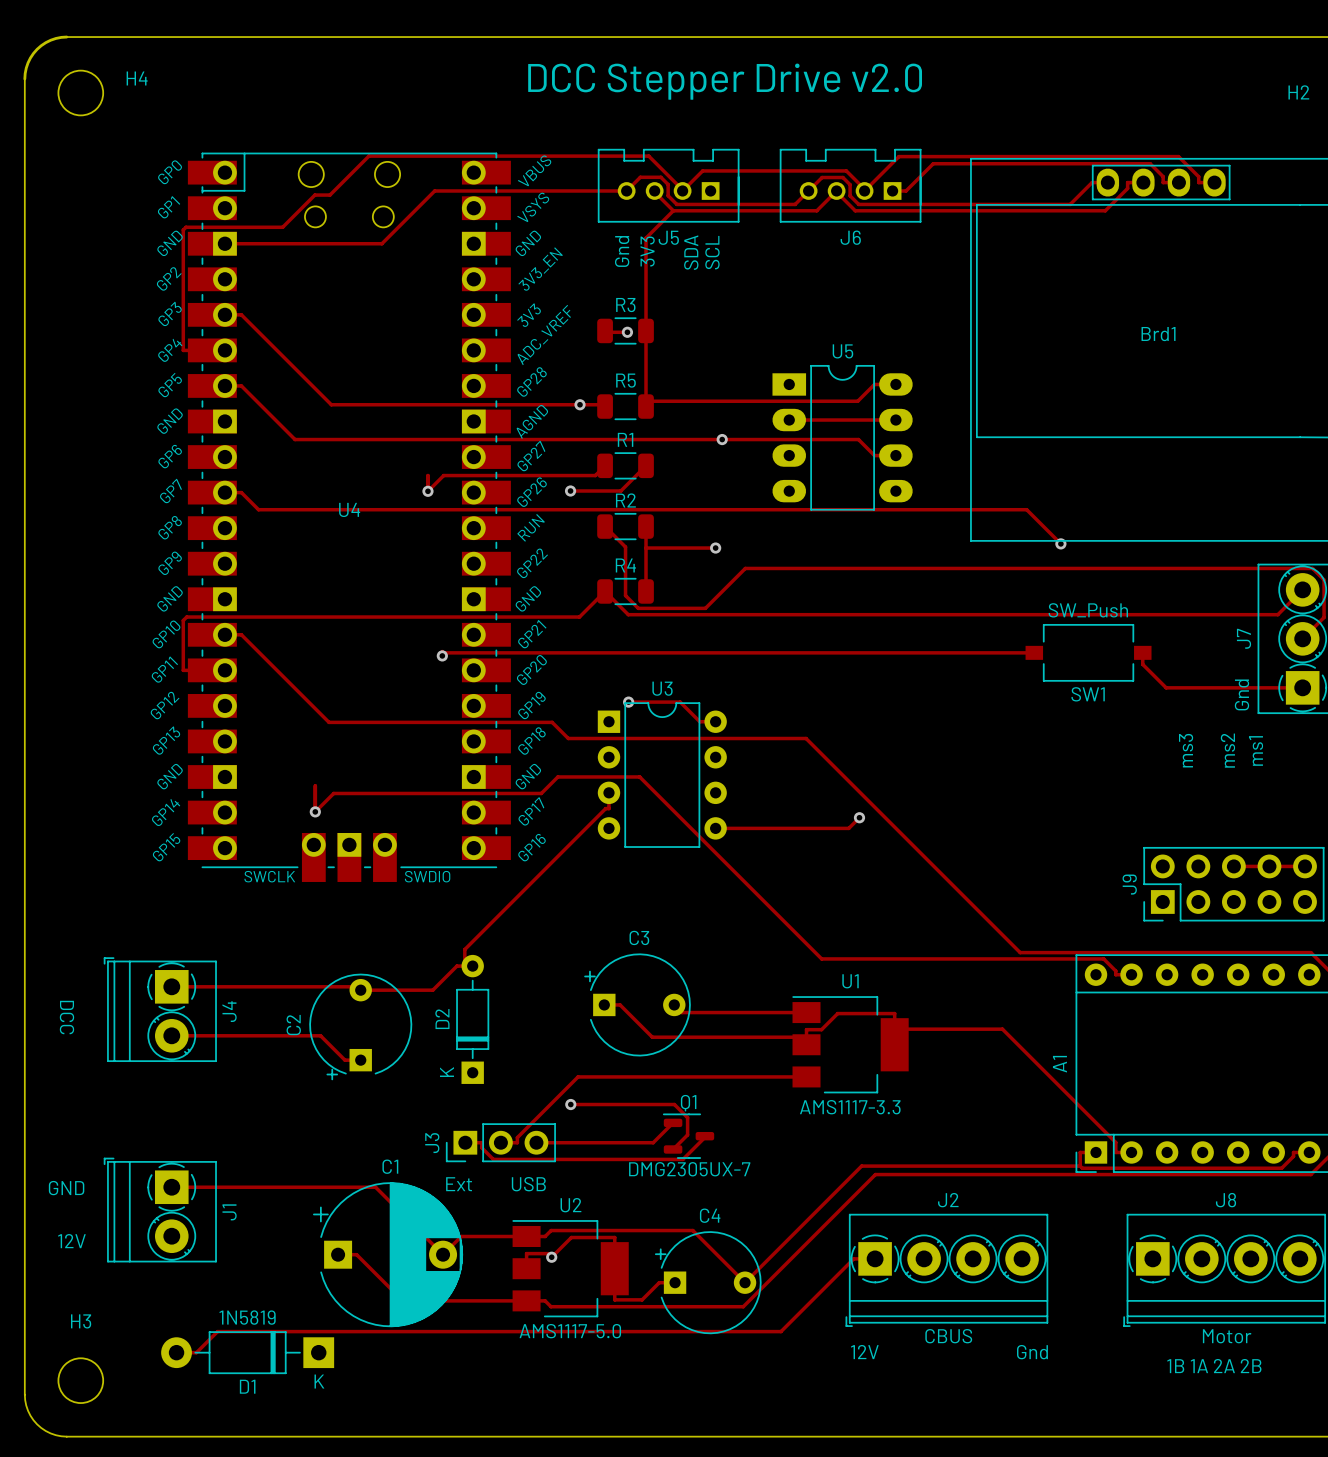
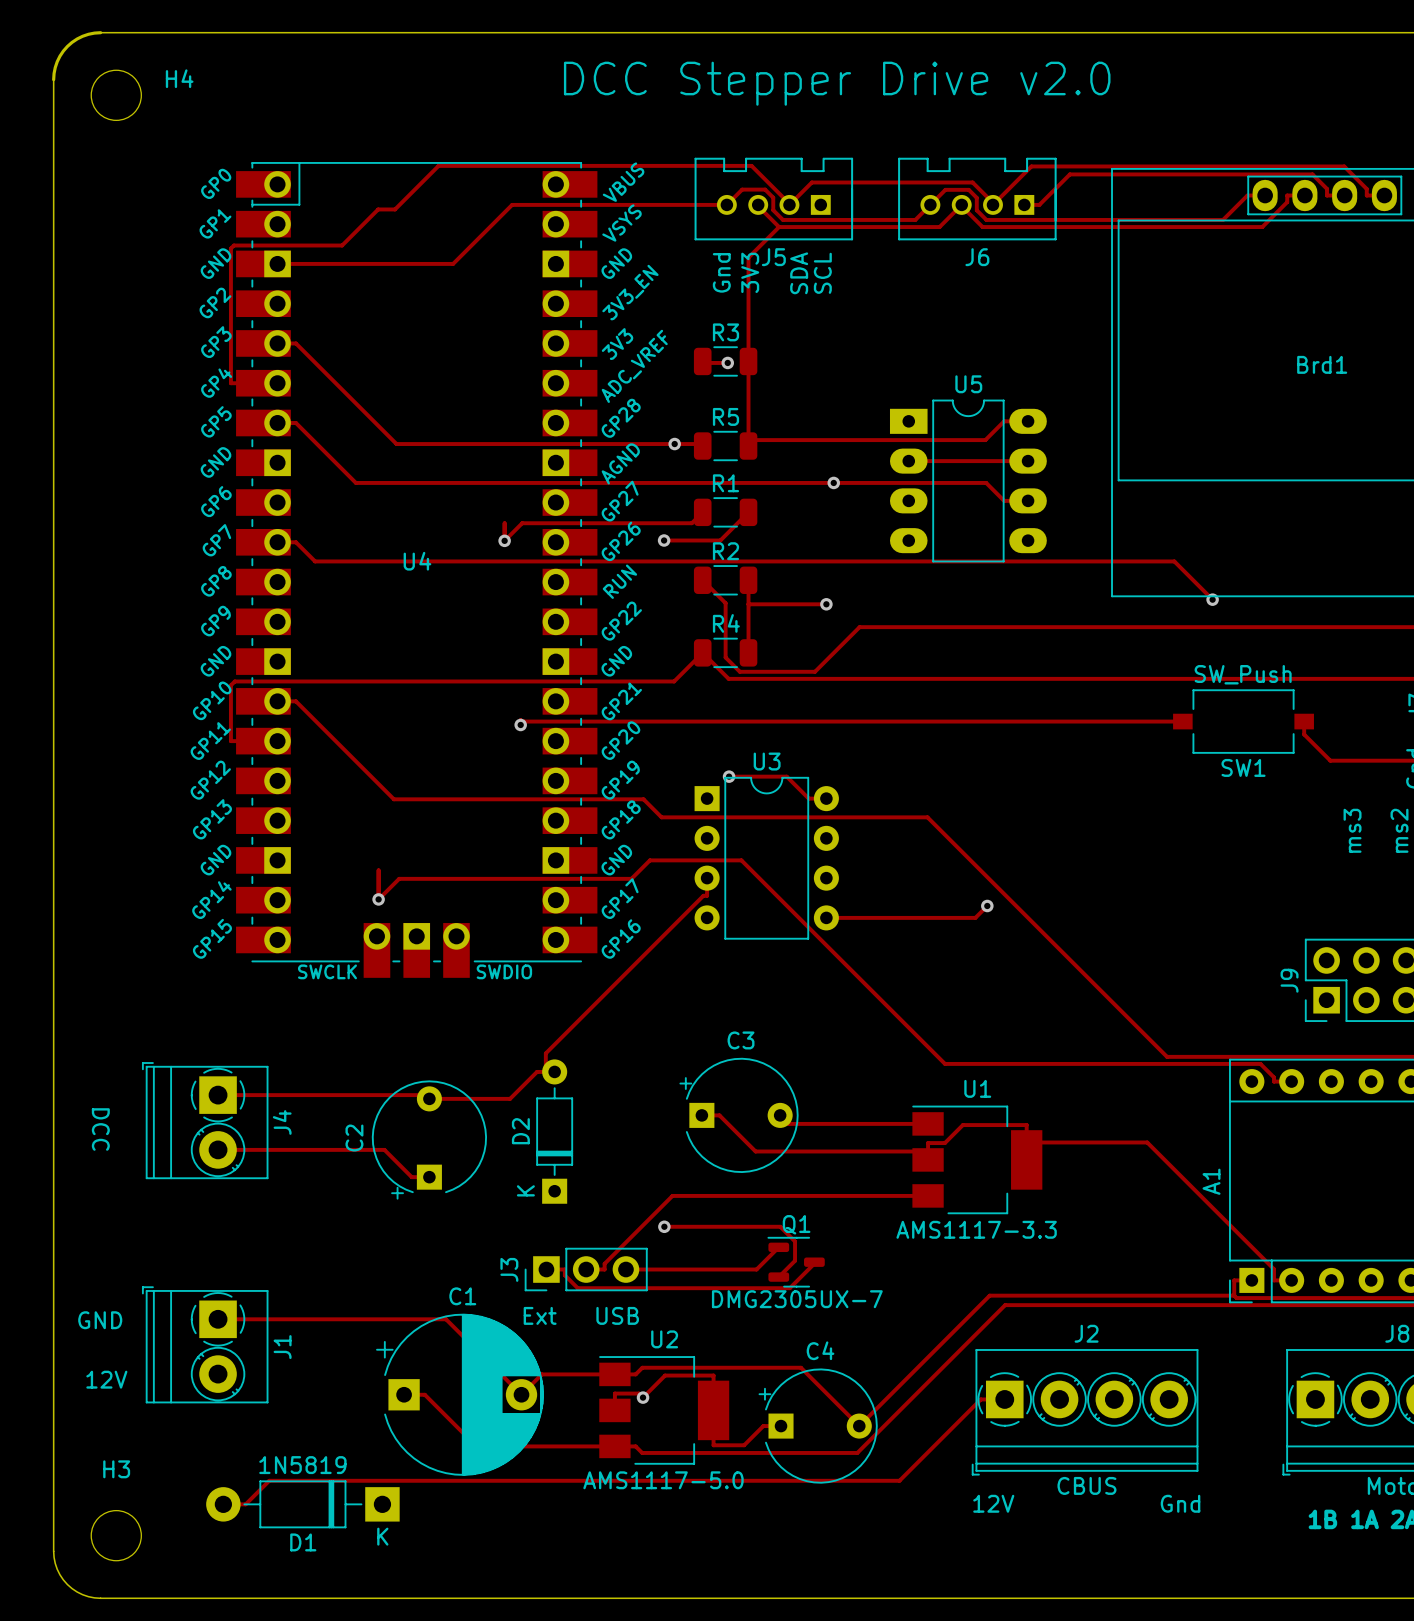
U4 footprint: [187, 152, 511, 882] -> [236, 162, 598, 978]

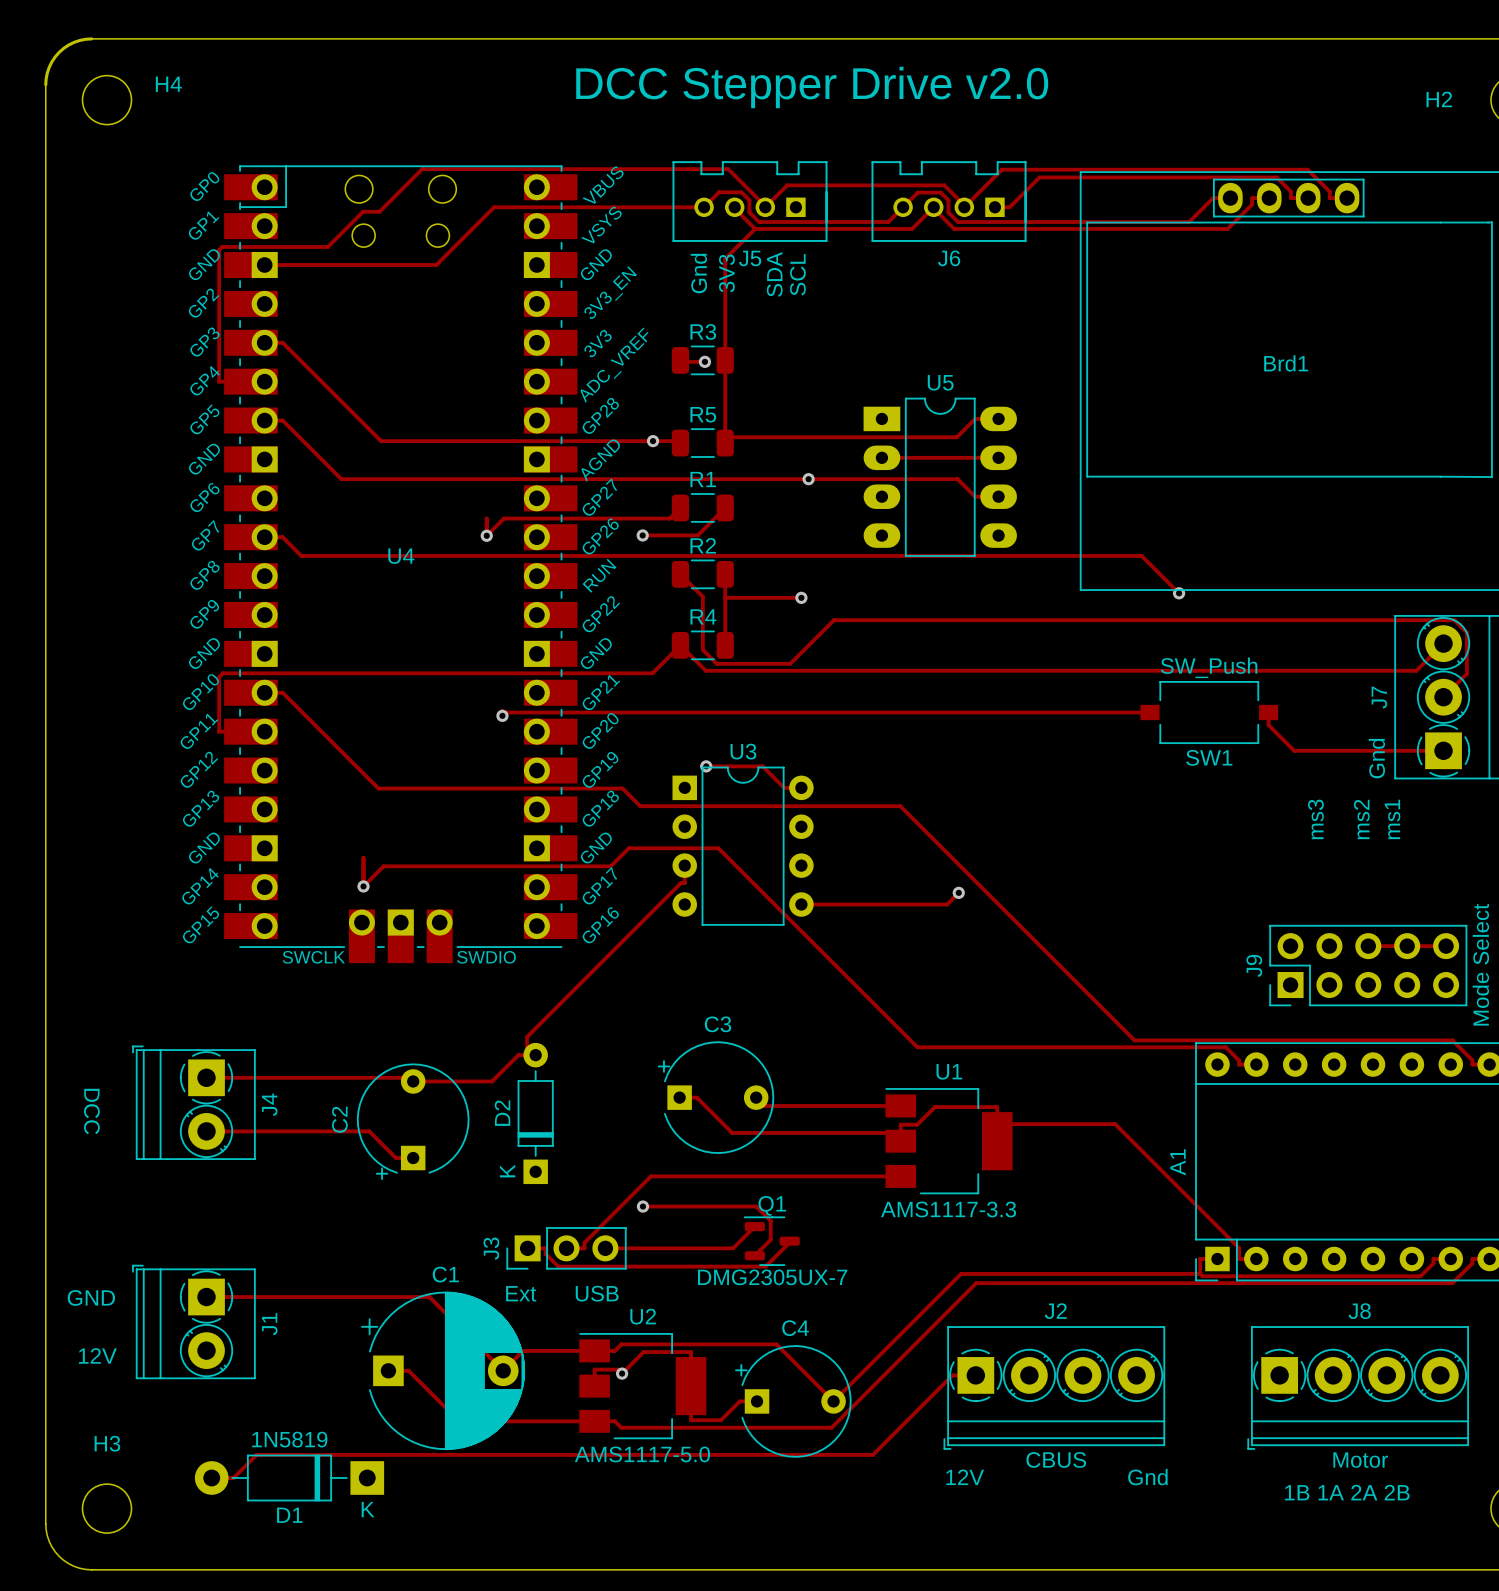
U4 footprint: [236, 162, 598, 978] -> [224, 165, 578, 964]

